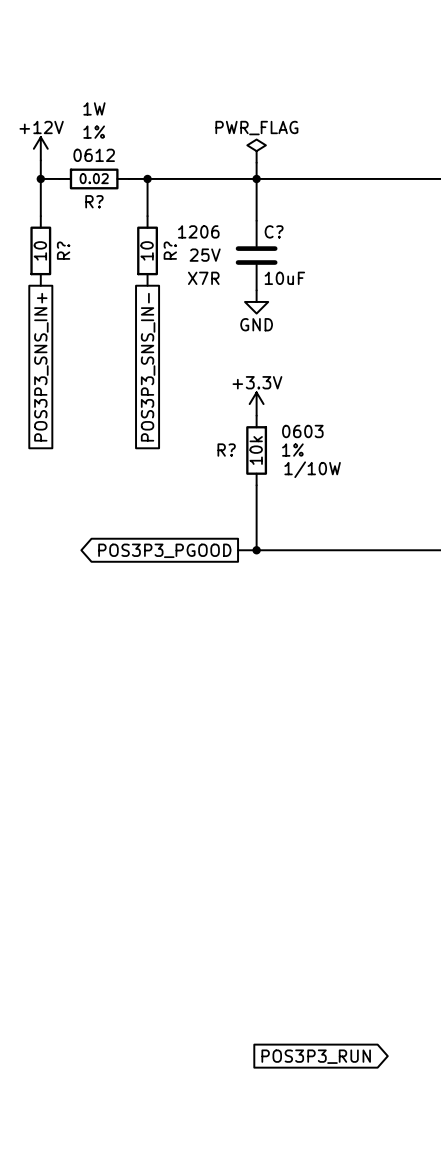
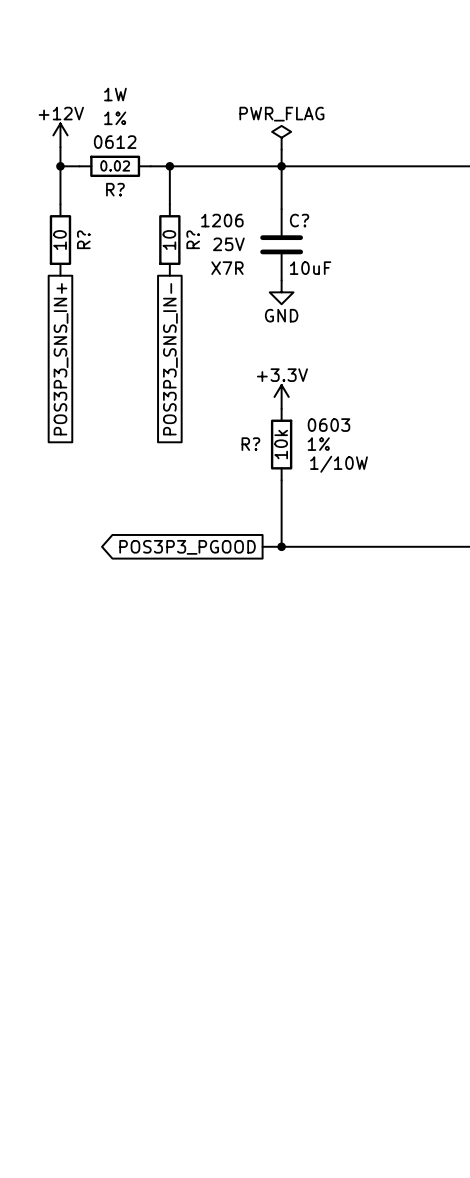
global label: POS3P3_RUN (316, 1056) -> none

